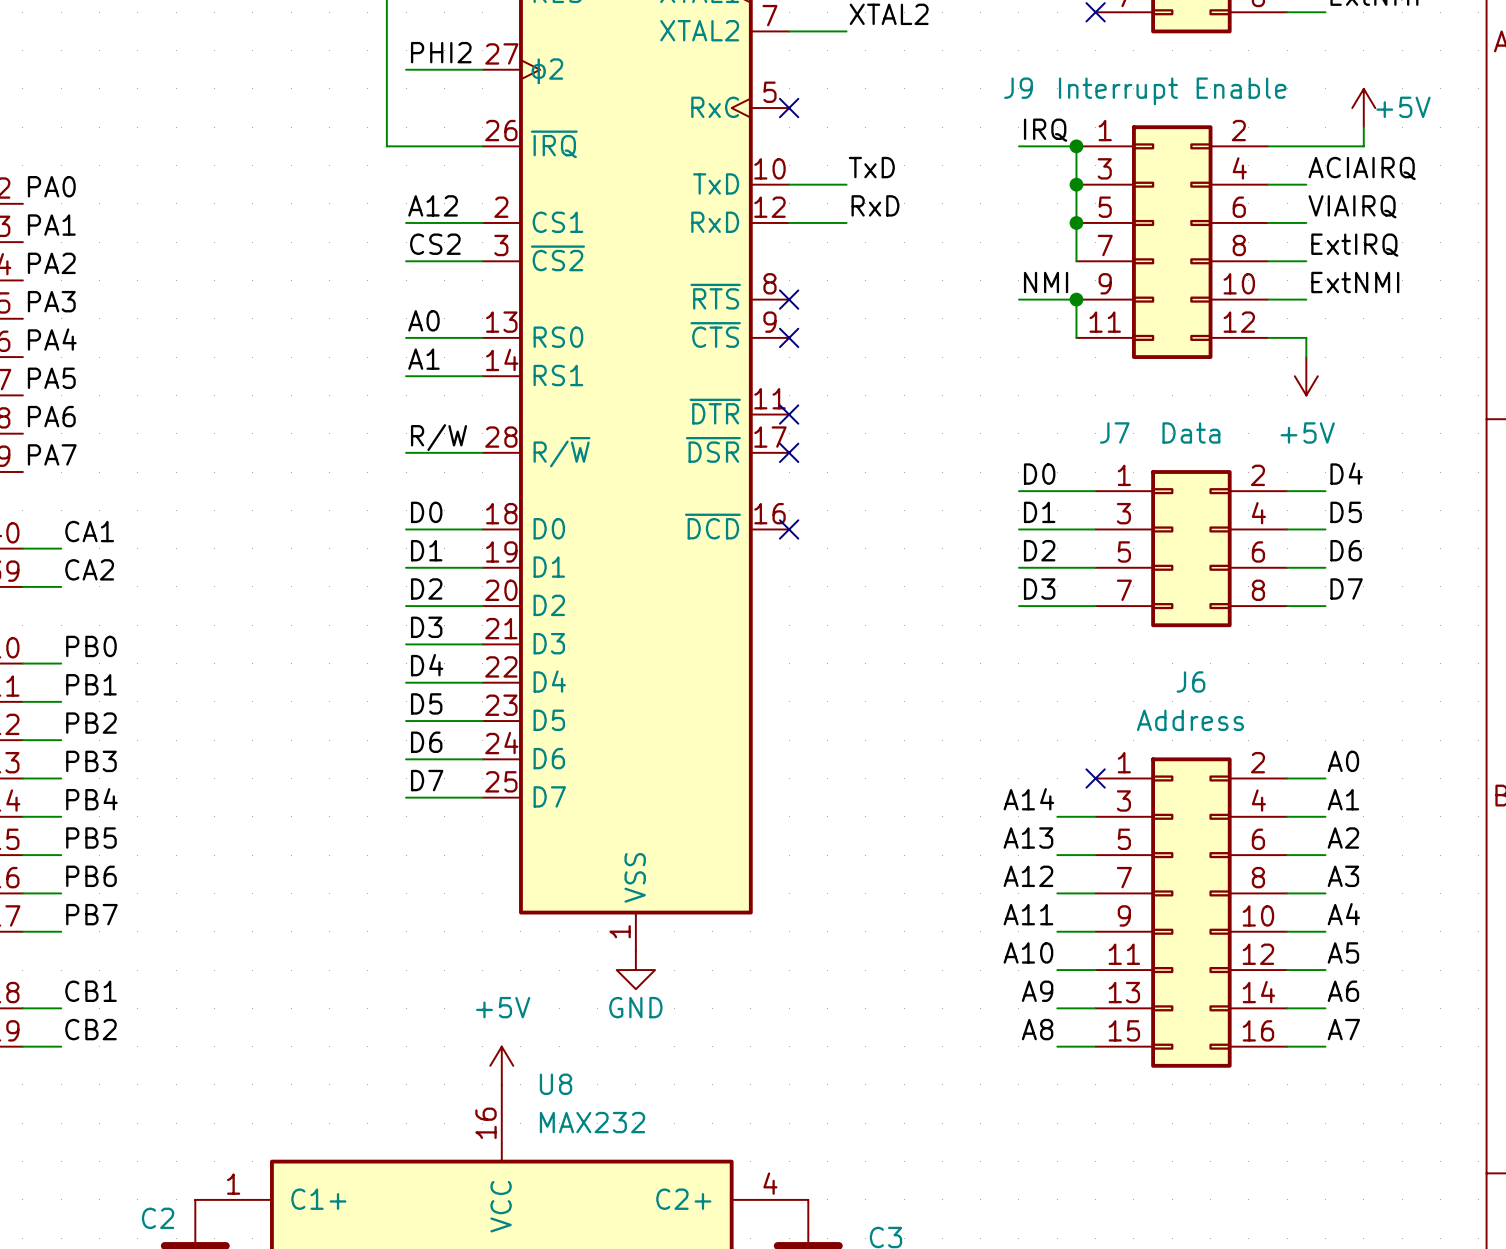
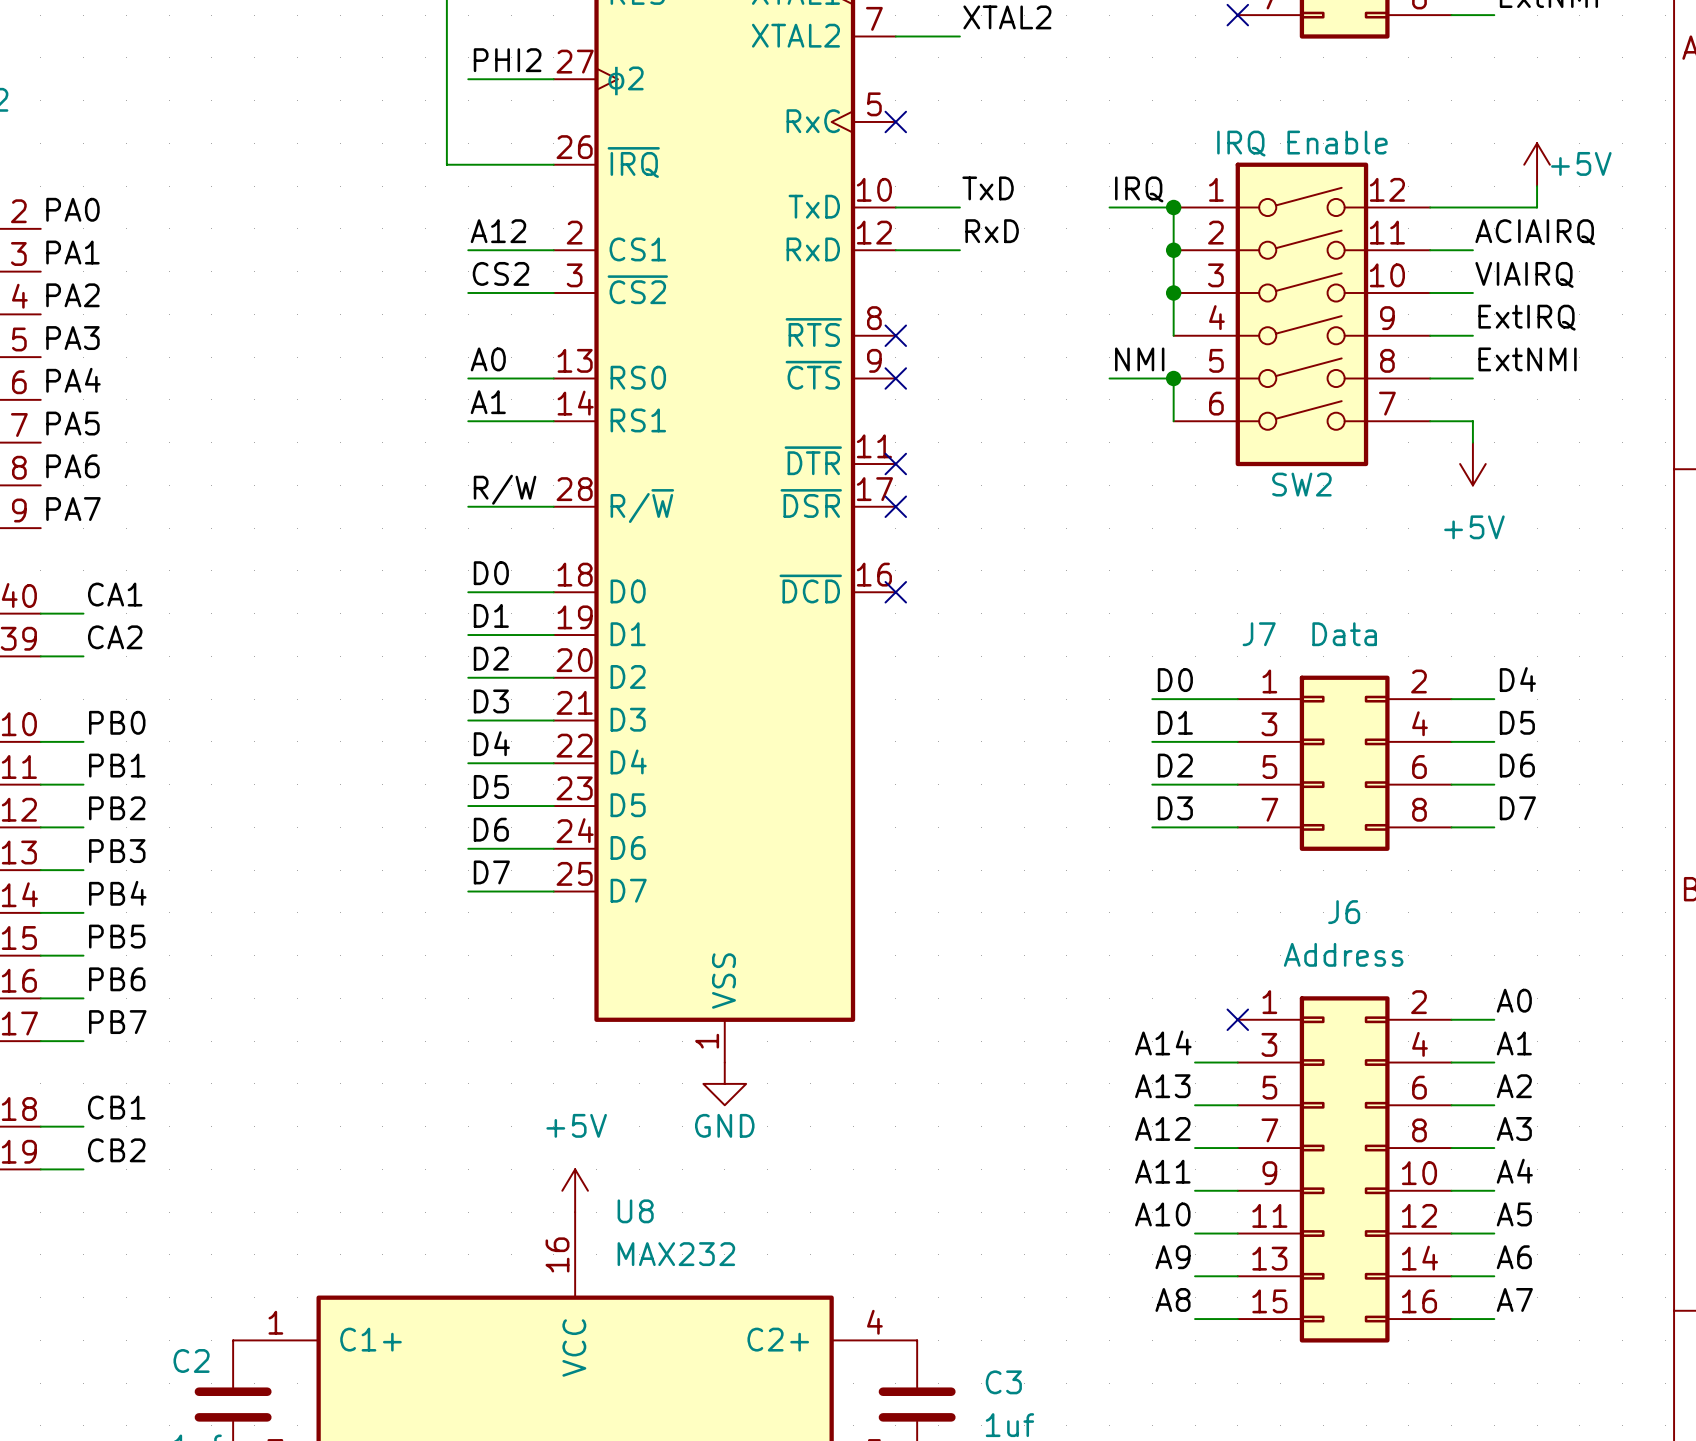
power symbol position: +5V (1363, 108) -> +5V (1537, 164)
wire: (1363, 127) (1363, 146) (1268, 146) -> none
label position: IRQ (1045, 130) -> IRQ (1139, 189)
wire: (1018, 146) (1076, 146) (1076, 261) -> (1109, 207) (1173, 207) (1173, 335)
junction: (1076, 146) -> none
wire: none -> (1537, 186) (1537, 207) (1472, 207)
label: ACIAIRQ (1362, 168) -> none
junction: none -> (1173, 207)
junction: (1076, 184) -> none
label: VIAIRQ (1352, 206) -> ACIAIRQ (1535, 232)
junction: none -> (1173, 250)
junction: (1076, 222) -> none
J9: Interrupt Enable (1172, 242) -> none
label: ExtIRQ (1354, 245) -> VIAIRQ (1524, 274)
junction: none -> (1173, 292)
SW2: none -> IRQ Enable (1301, 314)
label position: NMI (1046, 282) -> NMI (1139, 359)
label: ExtNMI (1355, 282) -> ExtIRQ (1527, 317)
wire: (1018, 299) (1076, 299) (1076, 337) -> (1109, 378) (1173, 378) (1173, 421)
junction: (1076, 299) -> none
label: none -> ExtNMI (1527, 359)
junction: none -> (1173, 378)
wire: (1306, 337) (1306, 357) -> none
wire: none -> (1430, 421) (1472, 421) (1472, 442)
power symbol position: +5V (1306, 376) -> +5V (1472, 464)
label position: D4 (1346, 473) -> D4 (1517, 679)
label position: D0 (1039, 474) -> D0 (1175, 680)
wire: (1018, 491) (1095, 491) -> (1152, 699) (1237, 699)
wire: (1287, 491) (1325, 491) -> (1451, 699) (1494, 699)
label position: D1 (1039, 512) -> D1 (1175, 722)
label position: D5 (1346, 512) -> D5 (1517, 722)
wire: (1018, 529) (1095, 529) -> (1152, 741) (1237, 741)
wire: (1287, 529) (1325, 529) -> (1451, 741) (1494, 741)
J7 position: (1191, 548) -> (1344, 763)
label position: D2 (1039, 550) -> D2 (1175, 765)
label position: D6 (1346, 550) -> D6 (1517, 765)
wire: (1018, 567) (1095, 567) -> (1152, 784) (1237, 784)
wire: (1287, 567) (1325, 567) -> (1451, 784) (1494, 784)
label position: D3 (1039, 588) -> D3 (1175, 808)
label position: D7 (1346, 588) -> D7 (1517, 808)
wire: (1018, 606) (1095, 606) -> (1152, 827) (1237, 827)
wire: (1287, 606) (1325, 606) -> (1451, 827) (1494, 827)
label position: A0 (1343, 761) -> A0 (1514, 1000)
no-connect mark: (1095, 778) -> none
wire: (1287, 778) (1325, 778) -> (1451, 1019) (1494, 1019)
label position: A14 (1028, 799) -> A14 (1163, 1042)
label position: A1 (1343, 799) -> A1 (1514, 1043)
wire: (1057, 816) (1095, 816) -> (1195, 1062) (1237, 1062)
wire: (1287, 816) (1325, 816) -> (1451, 1062) (1494, 1062)
label position: A13 (1028, 838) -> A13 (1162, 1086)
label position: A2 (1343, 838) -> A2 (1514, 1086)
wire: (1057, 855) (1095, 855) -> (1195, 1105) (1237, 1105)
wire: (1287, 855) (1325, 855) -> (1451, 1105) (1494, 1105)
label position: A12 (1028, 876) -> A12 (1162, 1128)
label position: A3 (1343, 876) -> A3 (1514, 1128)
wire: (1057, 893) (1095, 893) -> (1195, 1148) (1237, 1148)
wire: (1287, 893) (1325, 893) -> (1451, 1148) (1494, 1148)
no-connect mark: none -> (1237, 1019)
J6 position: (1191, 912) -> (1344, 1169)
label position: A11 (1028, 914) -> A11 (1162, 1171)
label position: A4 (1343, 914) -> A4 (1514, 1171)
wire: (1057, 931) (1095, 931) -> (1195, 1190) (1237, 1190)
wire: (1287, 931) (1325, 931) -> (1451, 1190) (1494, 1190)
label position: A10 (1028, 952) -> A10 (1162, 1214)
label position: A5 (1343, 952) -> A5 (1514, 1214)
wire: (1057, 970) (1095, 970) -> (1195, 1233) (1237, 1233)
wire: (1287, 970) (1325, 970) -> (1451, 1233) (1494, 1233)
label position: A9 (1037, 991) -> A9 (1172, 1257)
label position: A6 (1343, 991) -> A6 (1514, 1257)
wire: (1057, 1008) (1095, 1008) -> (1195, 1276) (1237, 1276)
wire: (1287, 1008) (1325, 1008) -> (1451, 1276) (1494, 1276)
label position: A8 (1037, 1029) -> A8 (1172, 1299)
label position: A7 (1343, 1029) -> A7 (1514, 1299)
wire: (1057, 1046) (1095, 1046) -> (1195, 1319) (1237, 1319)
wire: (1287, 1046) (1325, 1046) -> (1451, 1319) (1494, 1319)

